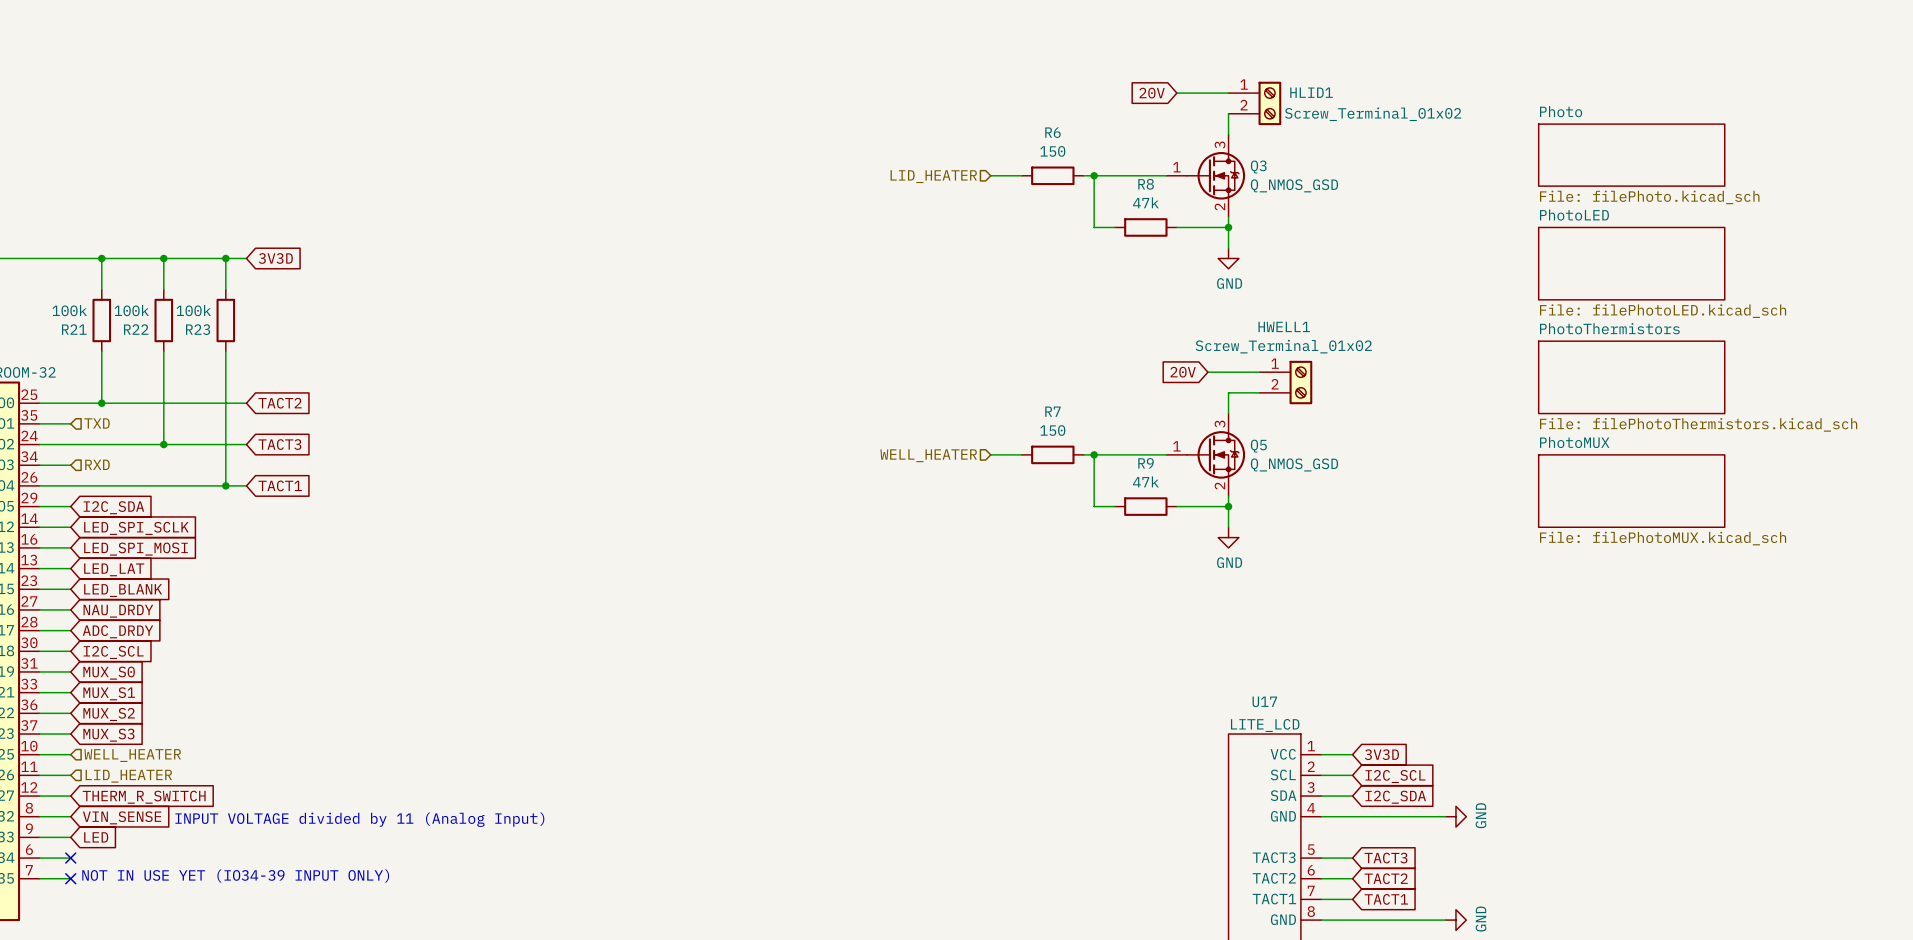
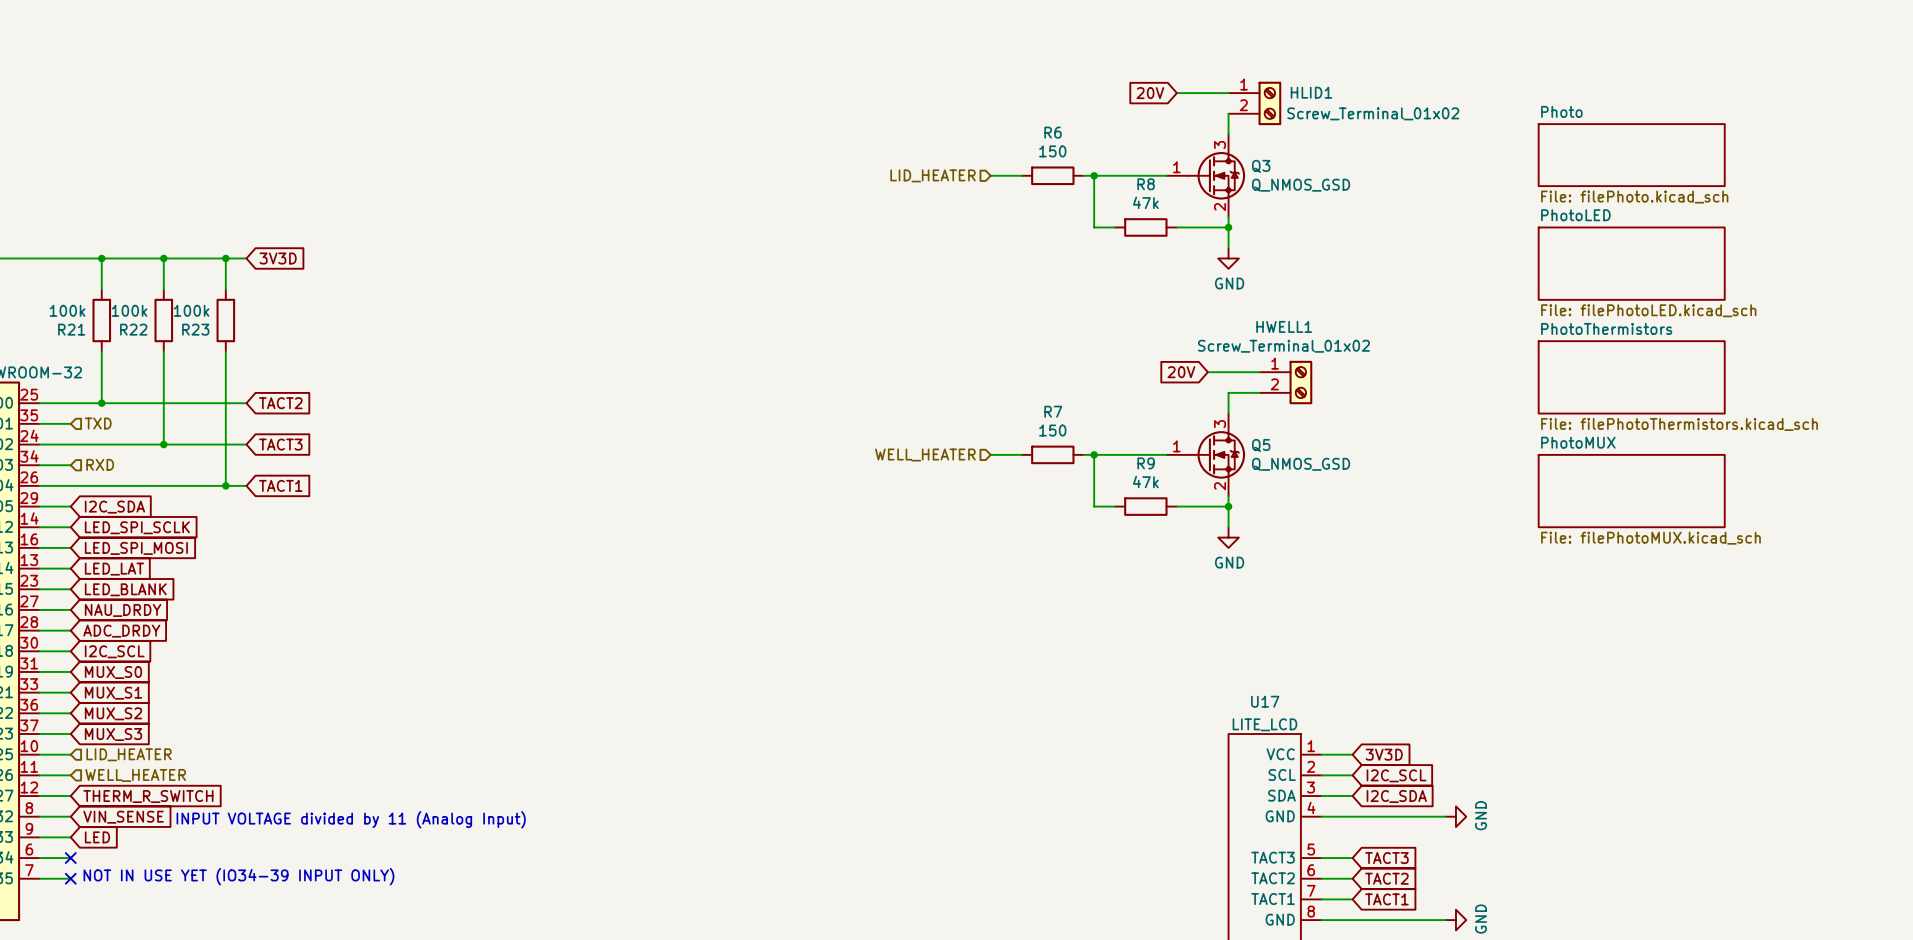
hierarchical label: WELL_HEATER (132, 755) -> LID_HEATER (129, 754)
hierarchical label: LID_HEATER (128, 776) -> WELL_HEATER (135, 775)

